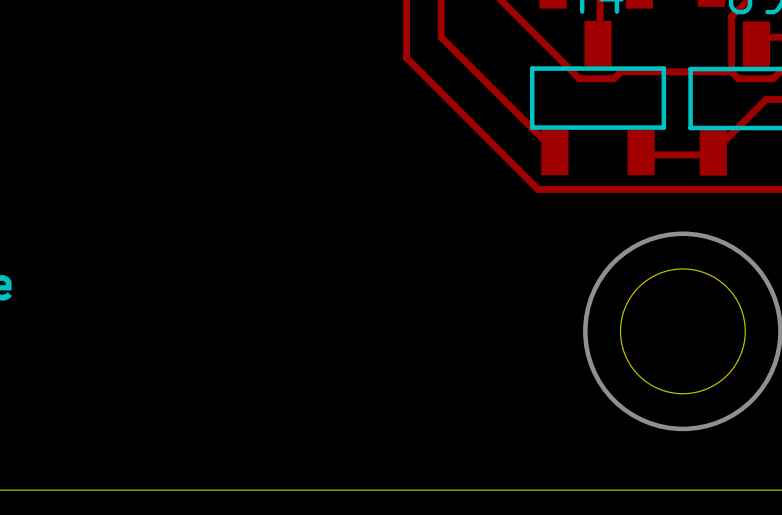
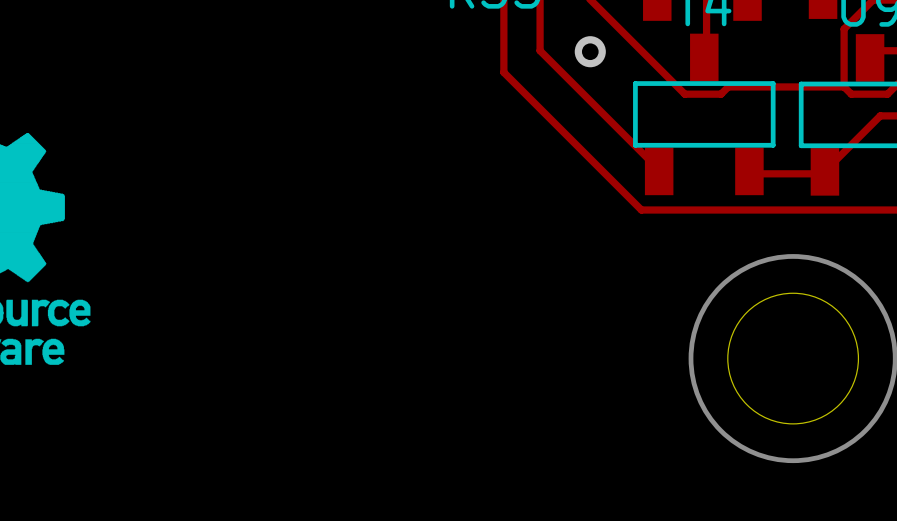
via: none -> (590, 51)

